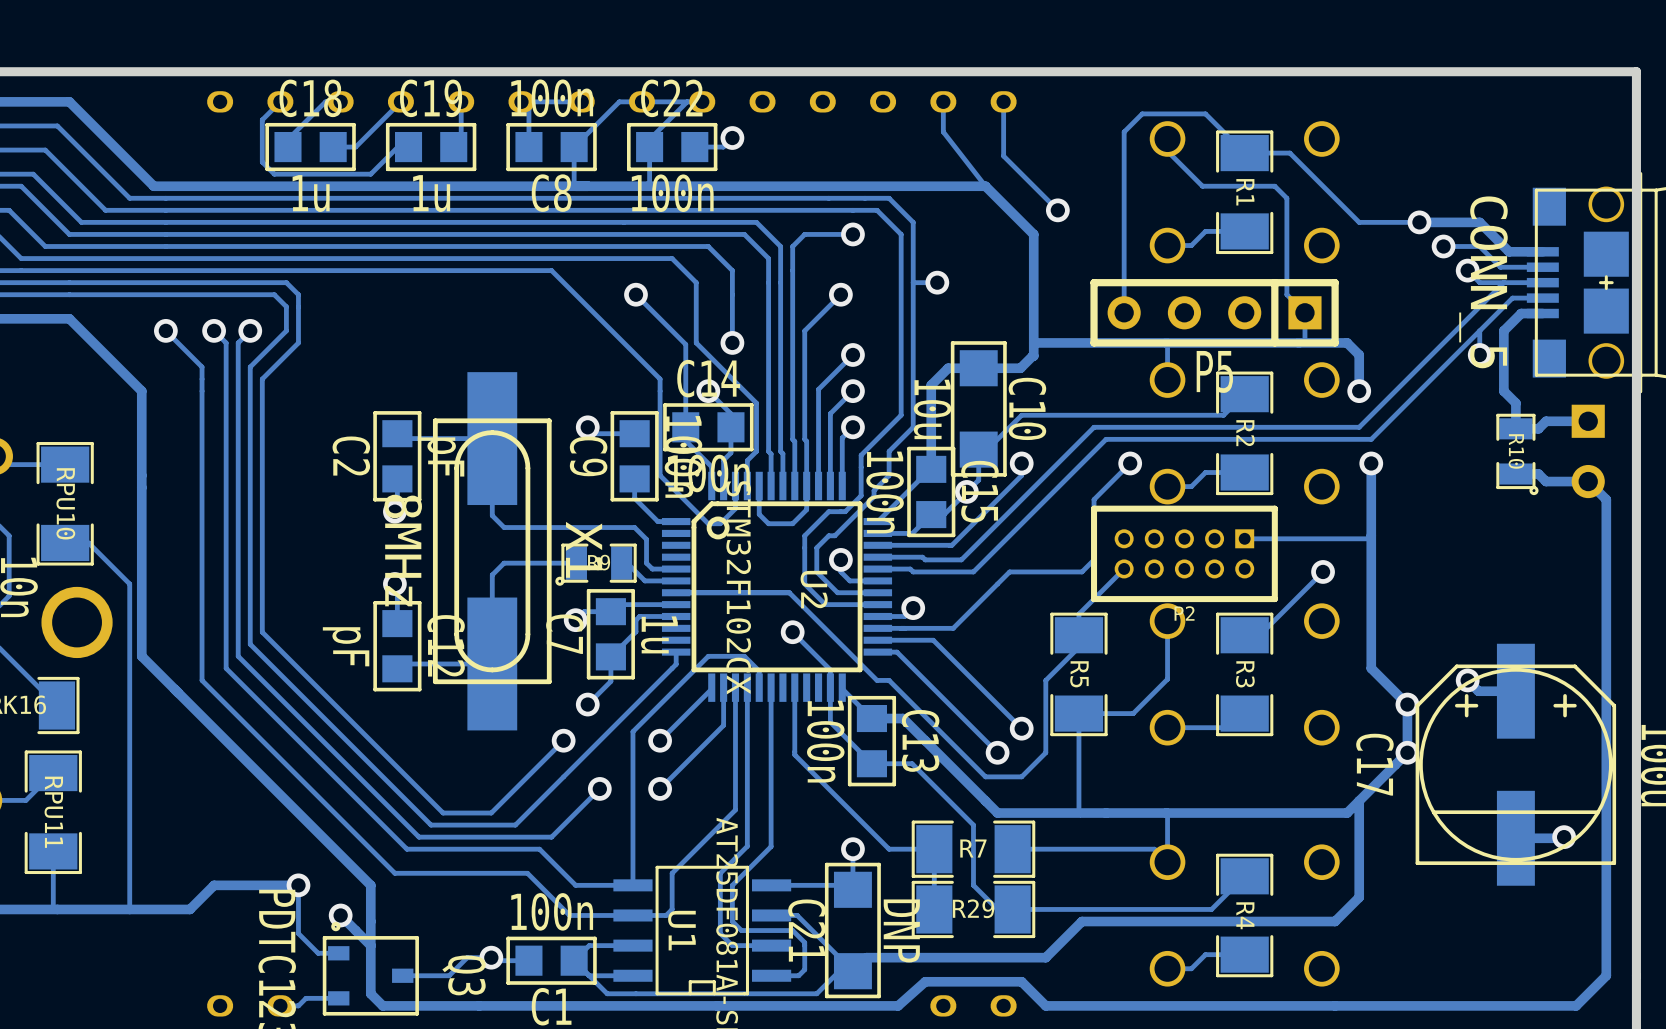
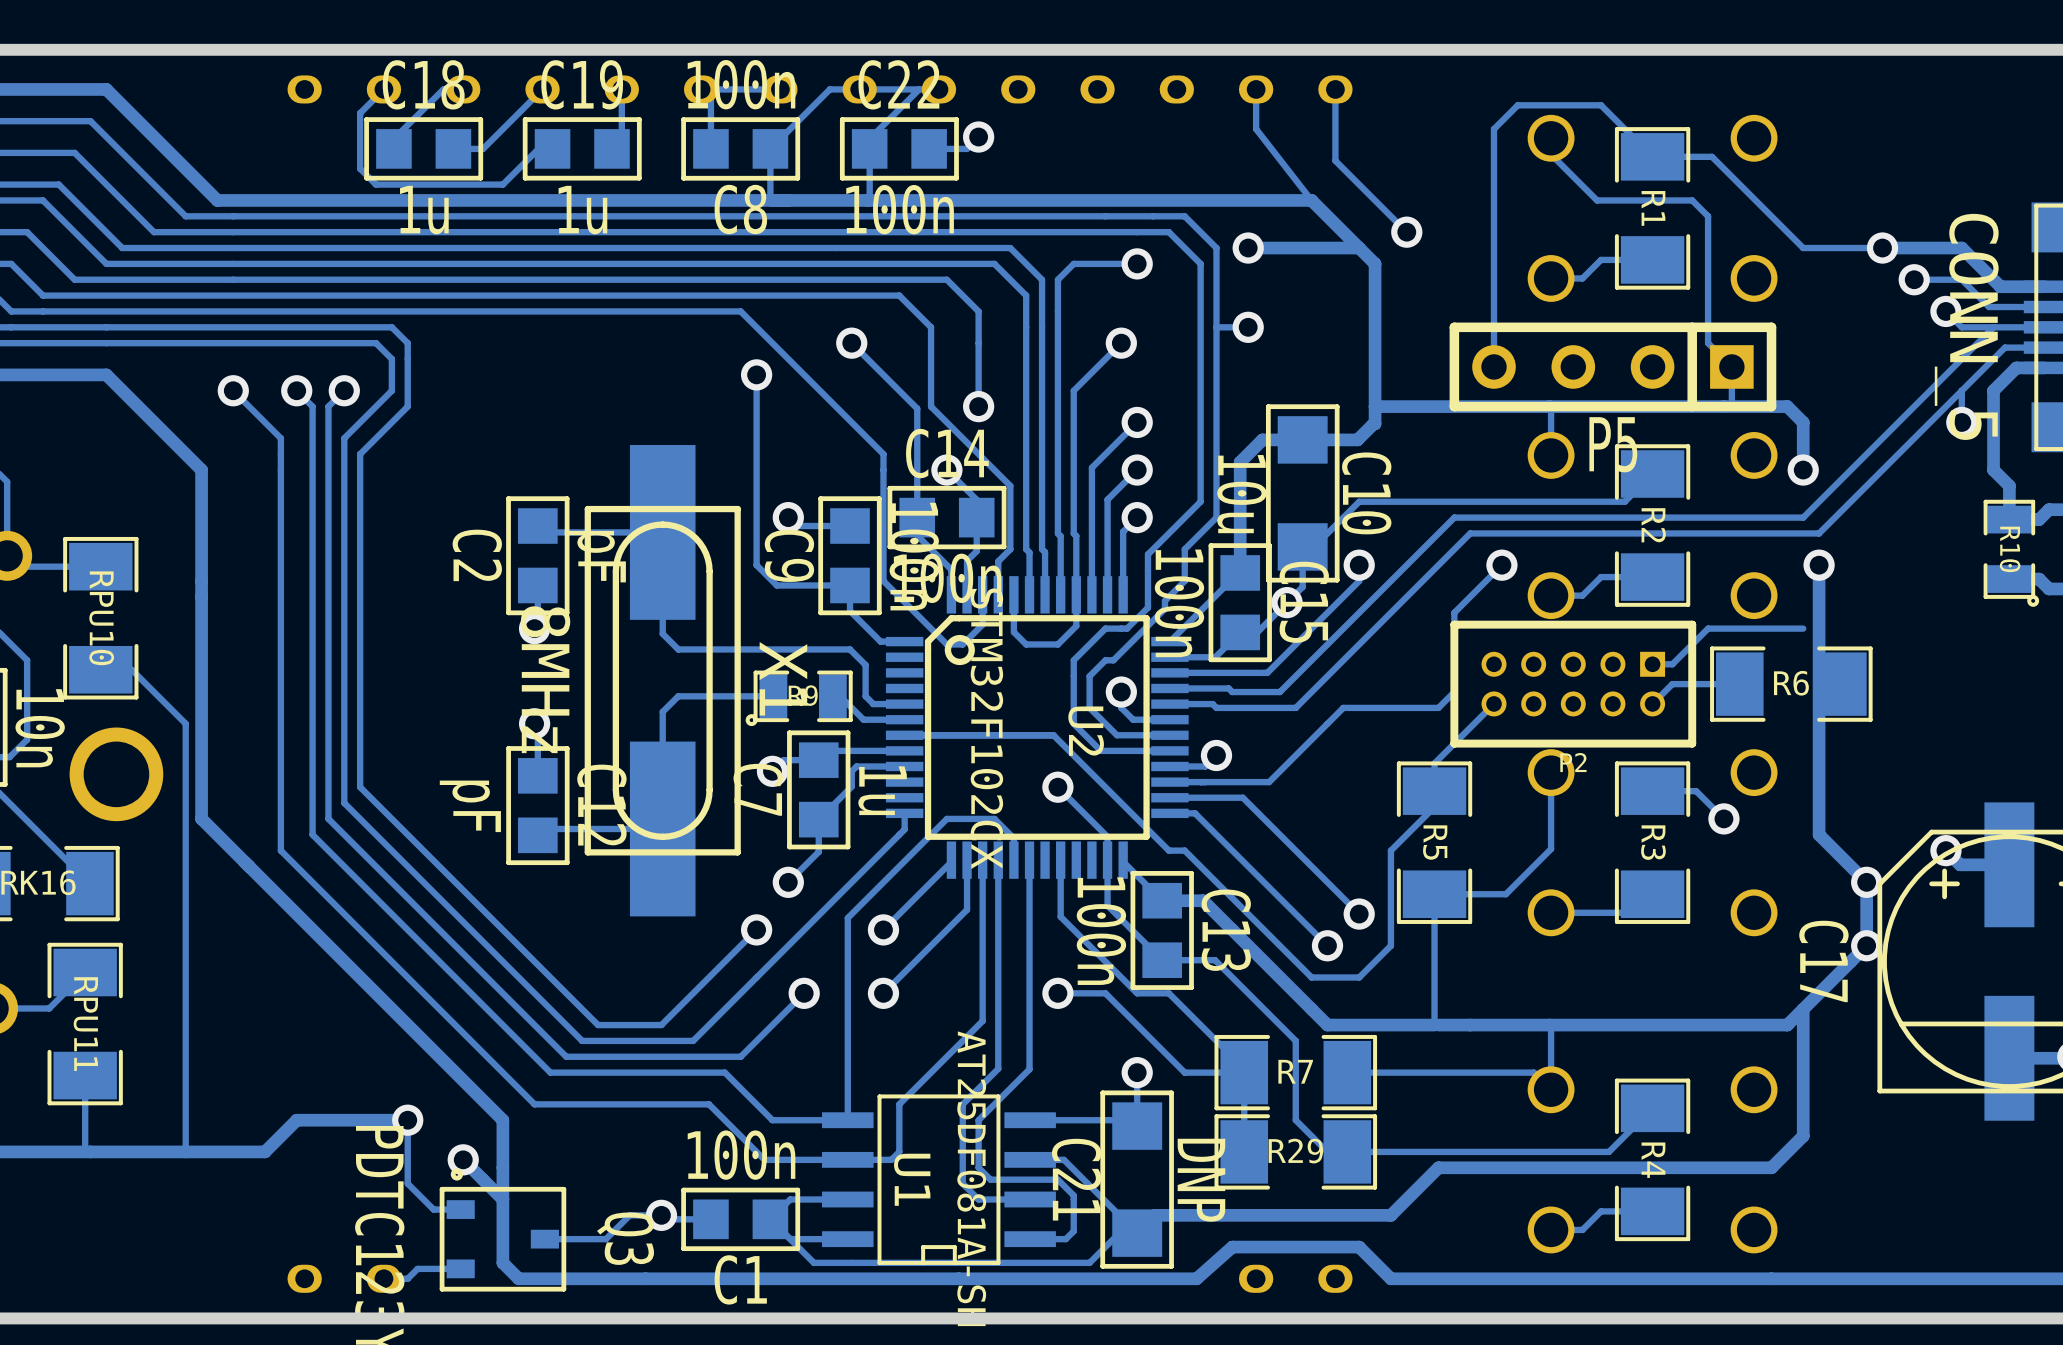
via: none -> (1248, 248)
track: none -> (1359, 248) (1248, 248)
track: none -> (756, 374) (756, 565) (776, 585) (850, 585)
via: none -> (756, 374)
track: (1371, 535) (1371, 538) (1259, 538) -> (1803, 628) (1708, 628) (1672, 664)
track: none -> (1739, 684) (1672, 684) (1652, 703)
R6: none -> (1791, 684)
track: (1323, 571) (1259, 635) -> (1723, 818) (1696, 791) (1672, 791)
via position: (1323, 571) -> (1723, 818)
track: (794, 730) (794, 754) (828, 788) -> (1057, 993) (1105, 993)
track: none -> (1060, 916) (1137, 993) (1168, 993) (1244, 1068) (1244, 1072)
via: none -> (1057, 993)

